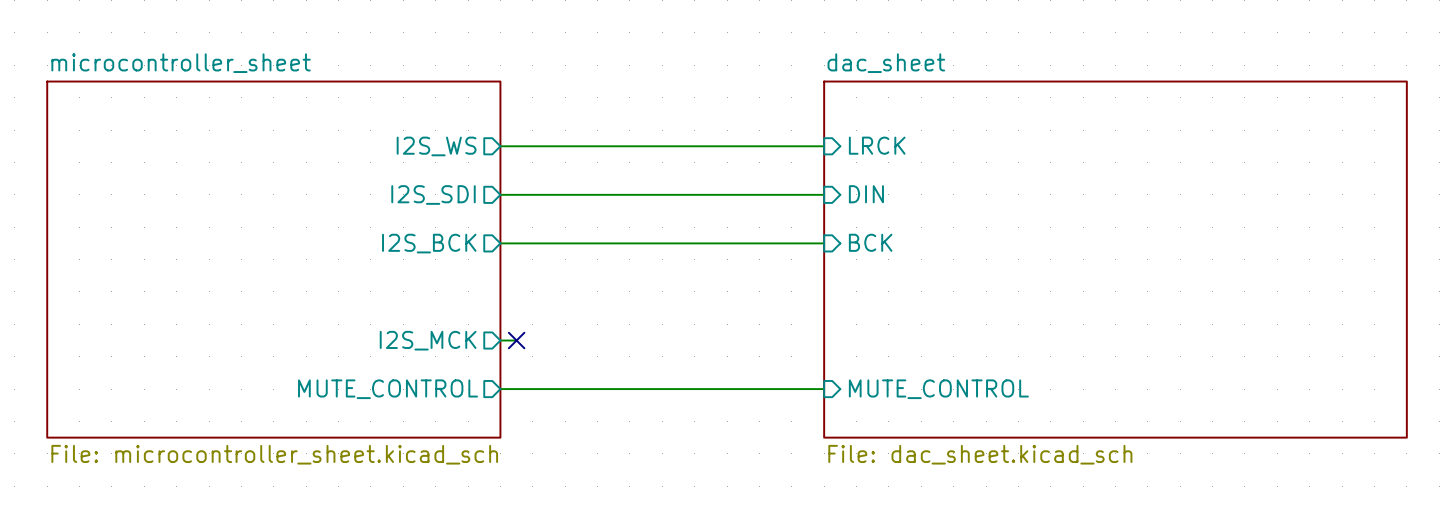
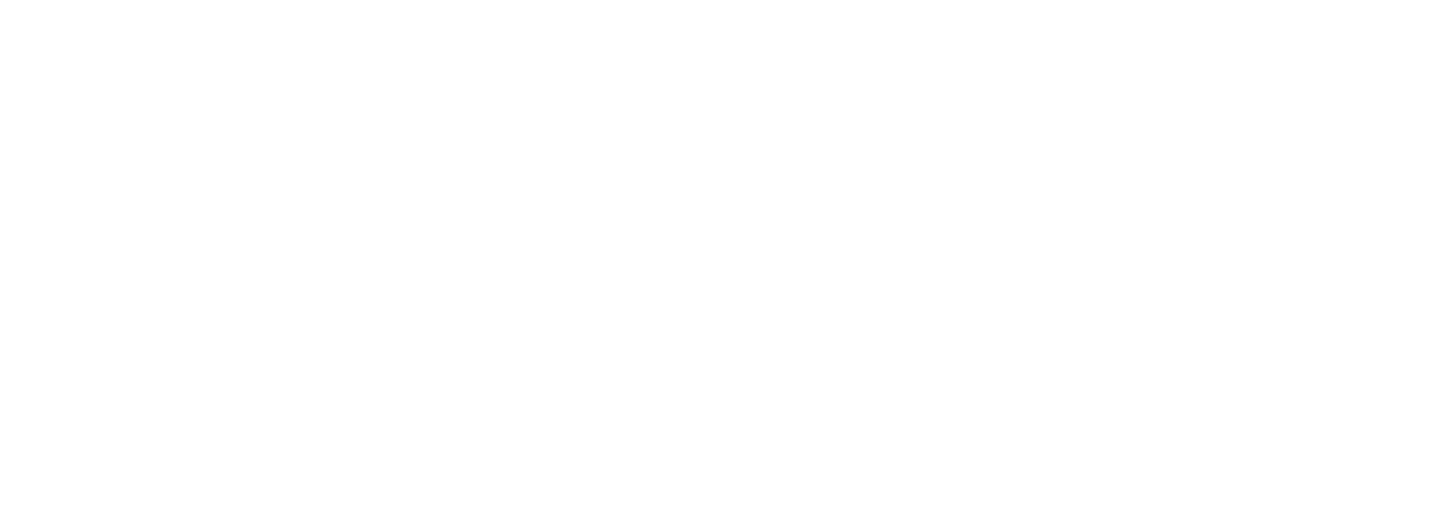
sheet pin: LRCK (877, 145) -> none
sheet pin: I2S_WS (436, 146) -> none
wire: (500, 146) (824, 146) -> none
wire: (500, 194) (824, 194) -> none
sheet pin: DIN (866, 194) -> none
sheet pin: I2S_SDI (433, 195) -> none
sheet pin: BCK (870, 242) -> none
sheet pin: I2S_BCK (429, 243) -> none
wire: (500, 243) (824, 243) -> none
sheet microcontroller_sheet: File: microcontroller_sheet.kicad_sch (273, 259) -> none
sheet dac_sheet: File: dac_sheet.kicad_sch (1115, 259) -> none
sheet pin: I2S_MCK (428, 340) -> none
wire: (500, 340) (516, 340) -> none
no-connect mark: (516, 340) -> none
sheet pin: MUTE_CONTROL (388, 389) -> none
wire: (500, 389) (824, 389) -> none
sheet pin: MUTE_CONTROL (938, 389) -> none

